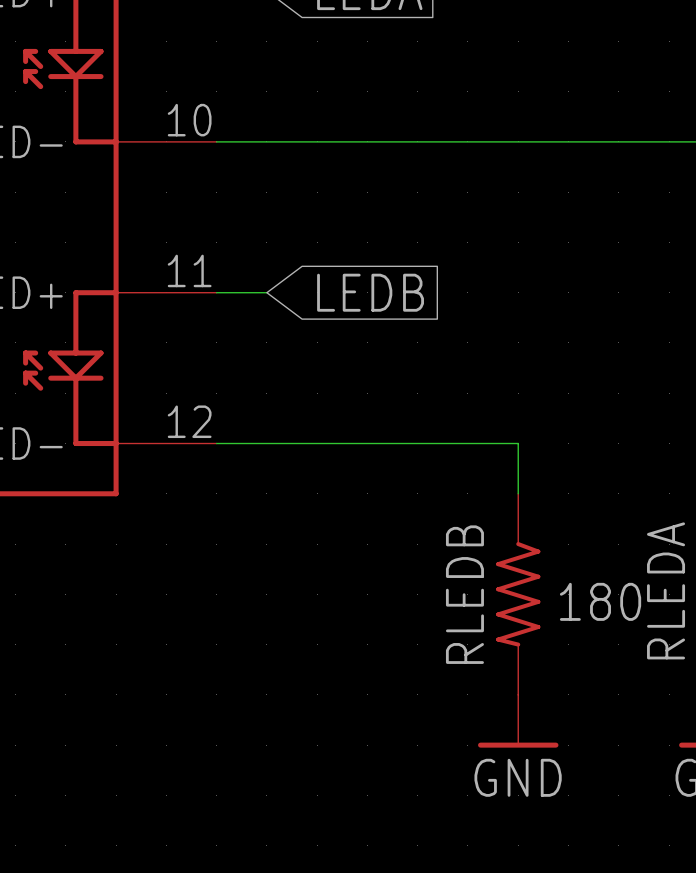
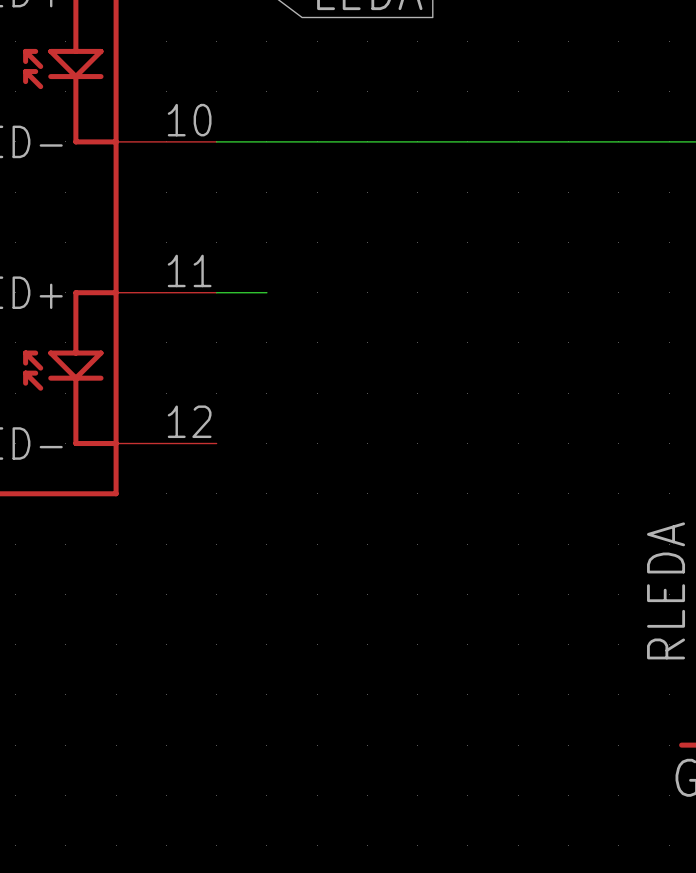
global label: LEDB (370, 292) -> none
wire: (216, 443) (518, 443) (518, 493) -> none
RLEDB: 180 (518, 594) -> none
power symbol: GND (518, 721) -> none

